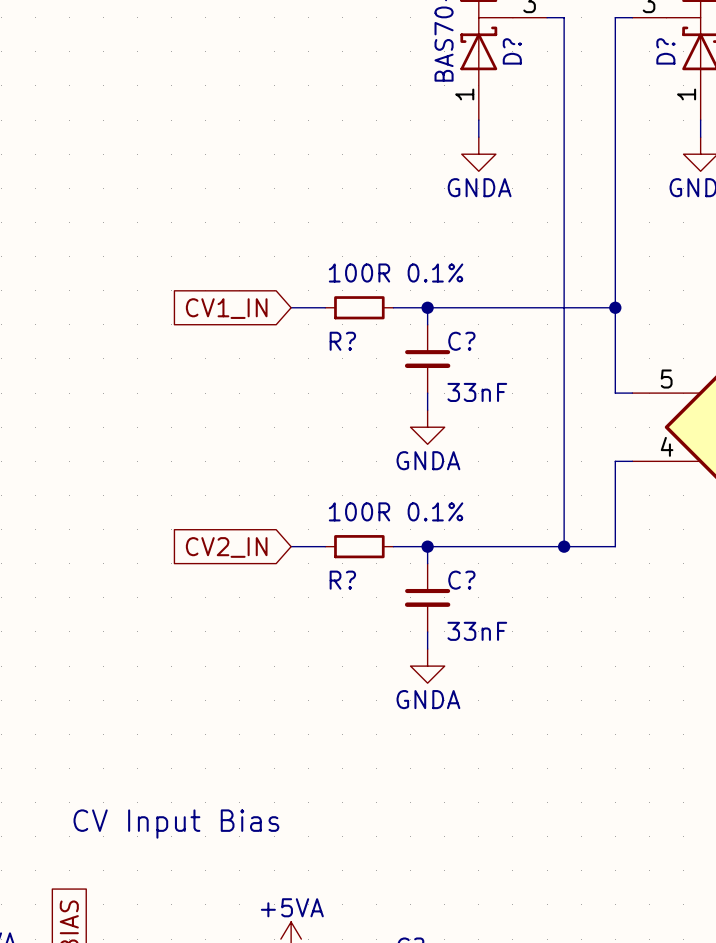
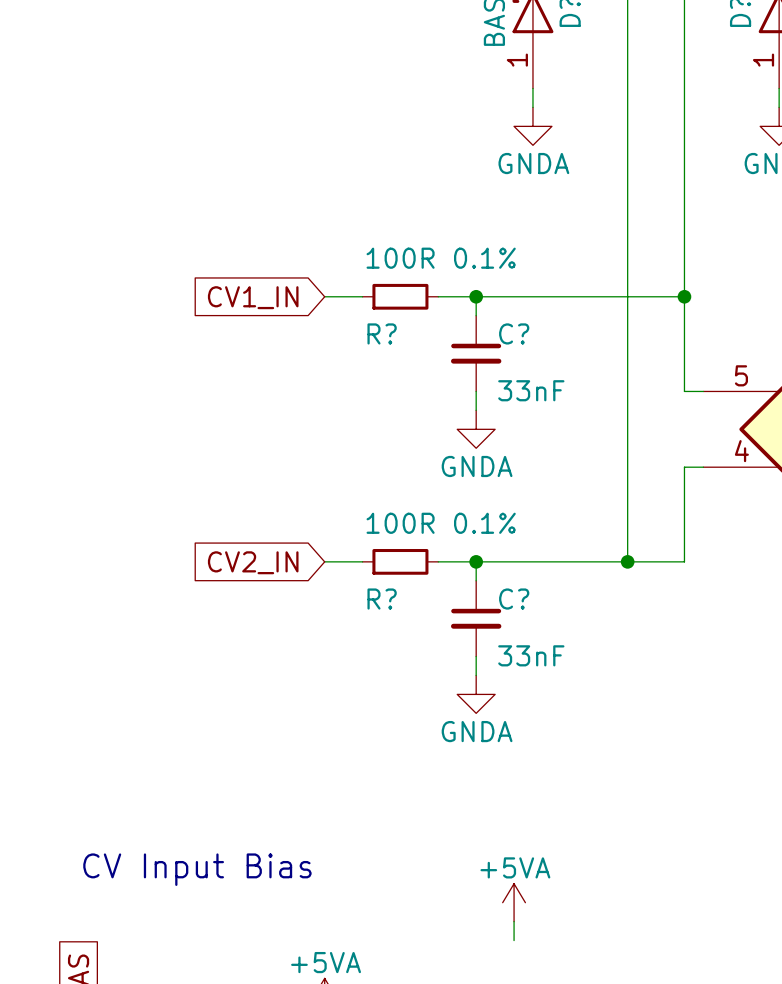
power symbol: none -> +5VA (514, 902)
wire: none -> (514, 921) (514, 940)

